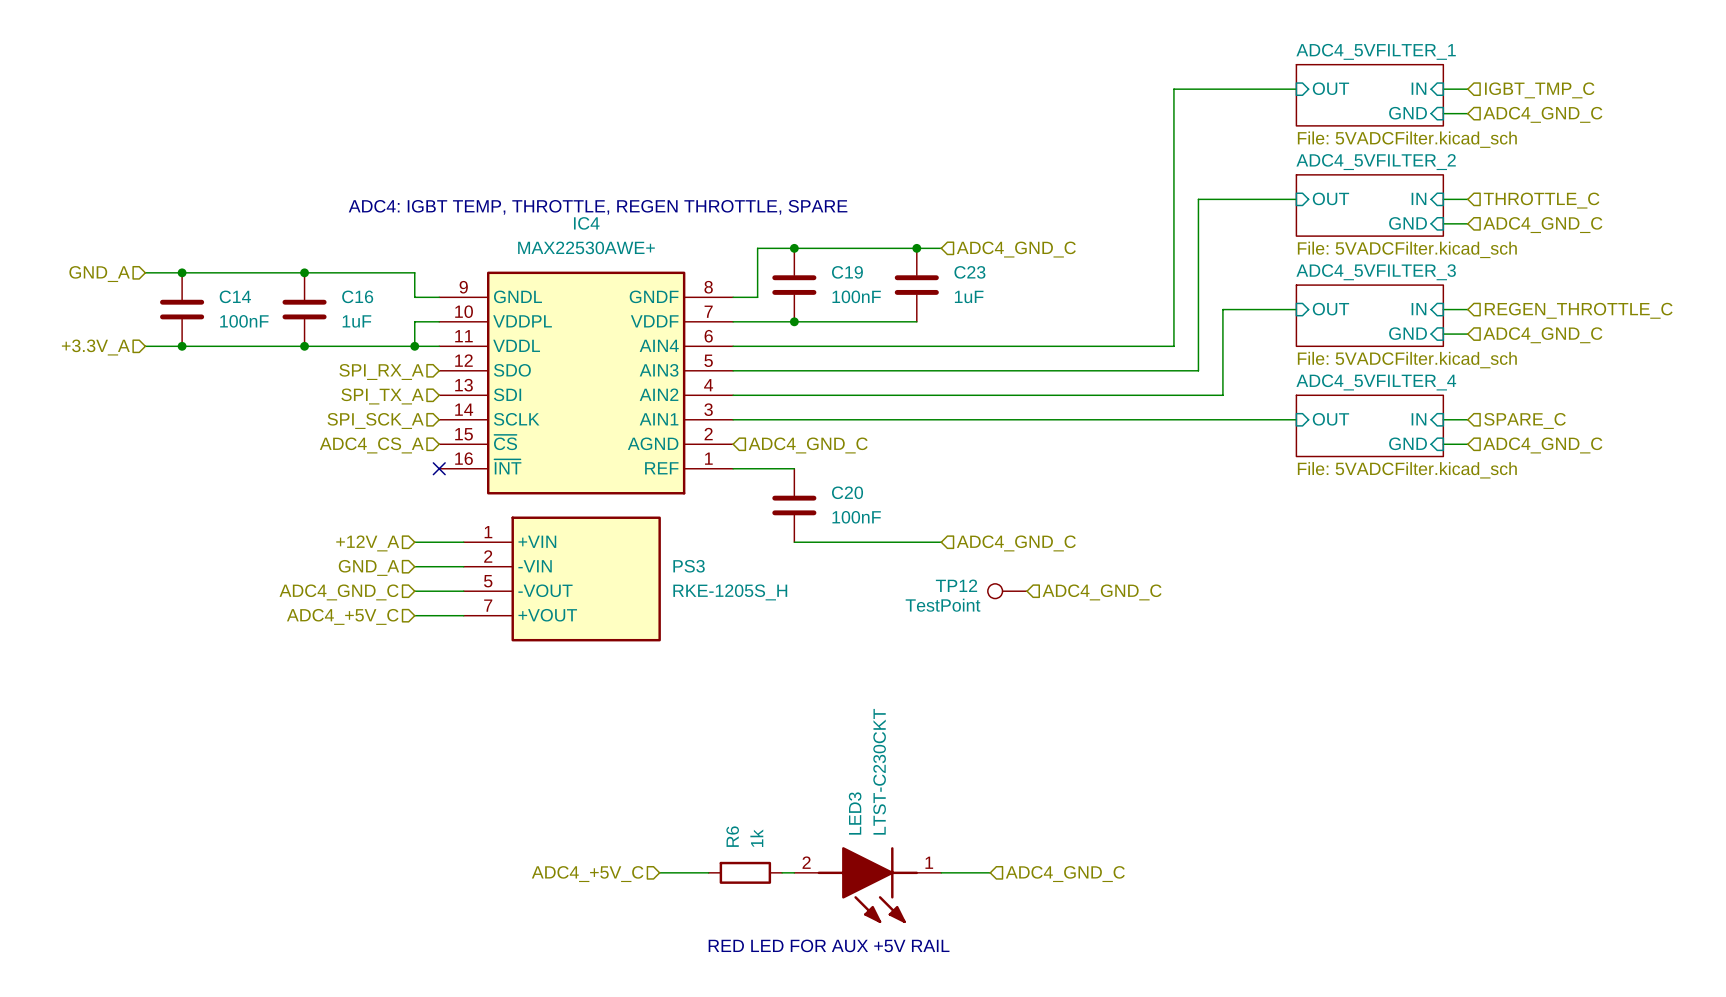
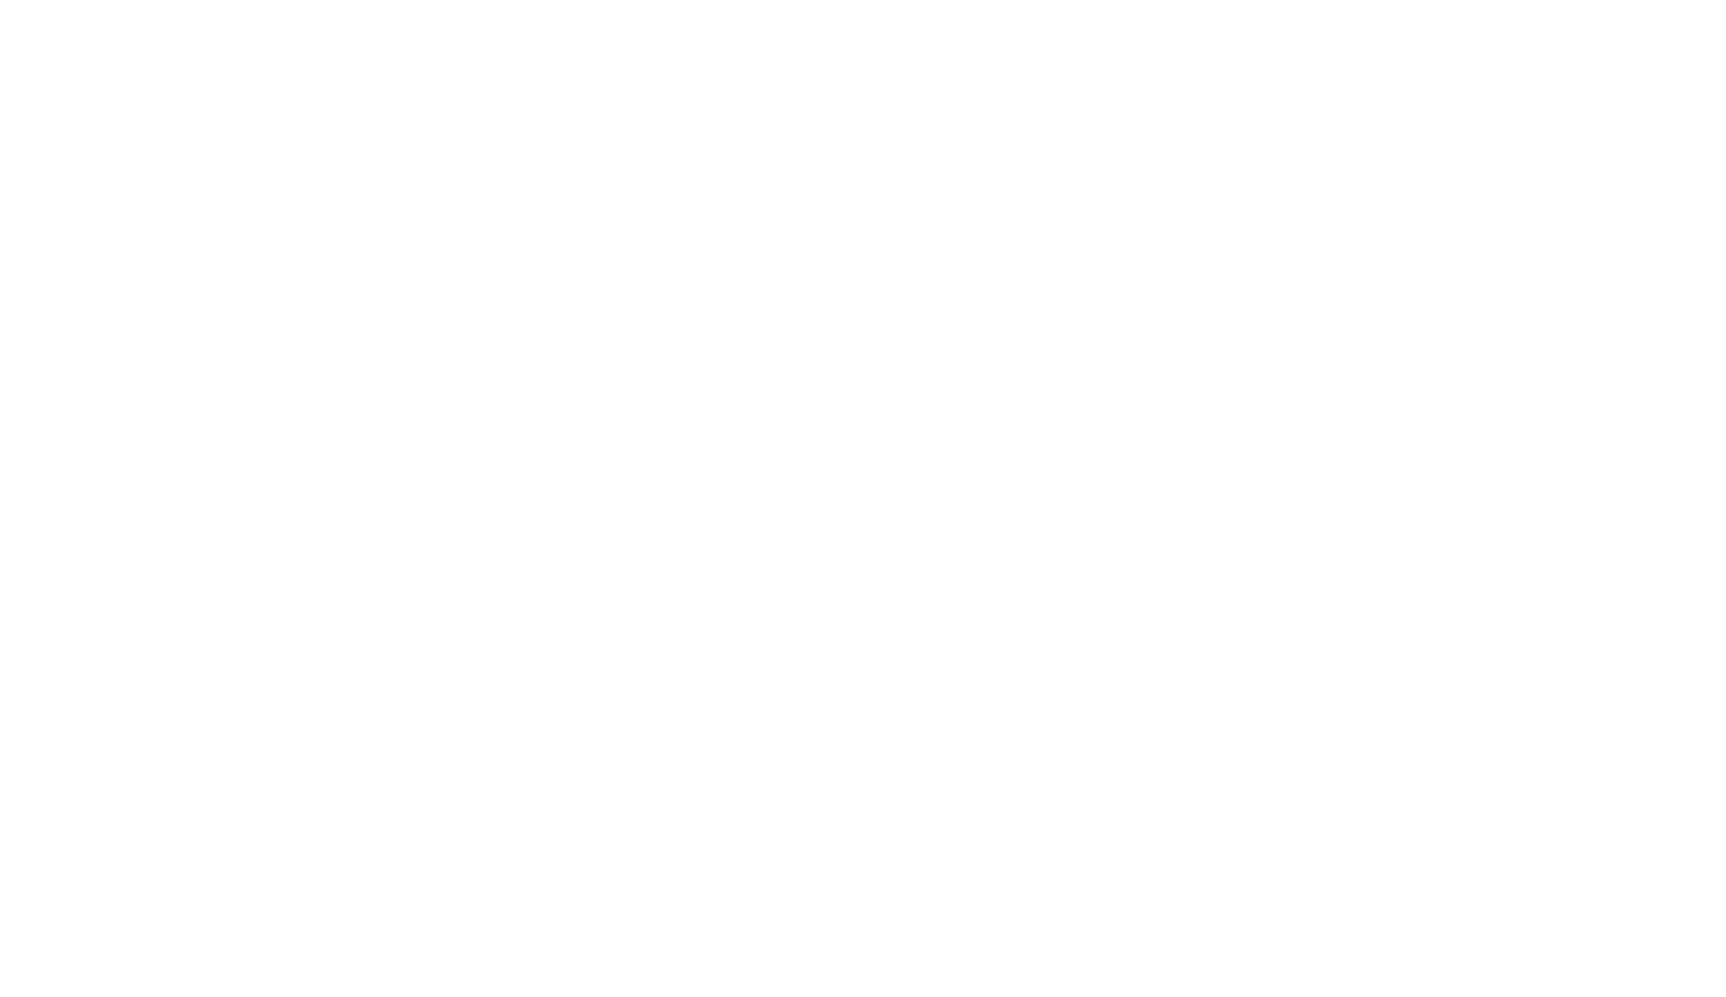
sheet pin: OUT (1330, 88) -> none
sheet pin: IN (1418, 88) -> none
wire: (1296, 89) (1173, 89) (1173, 346) (733, 346) -> none
wire: (1443, 89) (1467, 89) -> none
hierarchical label: IGBT_TMP_C (1539, 90) -> none
sheet ADC4_5VFILTER_1: File: 5VADCFilter.kicad_sch (1369, 95) -> none
sheet pin: GND (1408, 113) -> none
wire: (1443, 113) (1467, 113) -> none
hierarchical label: ADC4_GND_C (1542, 114) -> none
sheet pin: OUT (1330, 198) -> none
sheet pin: IN (1418, 198) -> none
wire: (1296, 199) (1198, 199) (1198, 370) (733, 370) -> none
wire: (1443, 199) (1467, 199) -> none
hierarchical label: THROTTLE_C (1541, 200) -> none
sheet ADC4_5VFILTER_2: File: 5VADCFilter.kicad_sch (1369, 205) -> none
text: ADC4: IGBT TEMP, THROTTLE, REGEN THROTTLE, SPARE (598, 207) -> none
sheet pin: GND (1408, 223) -> none
wire: (1443, 223) (1467, 223) -> none
hierarchical label: ADC4_GND_C (1542, 225) -> none
junction: (794, 248) -> none
junction: (916, 248) -> none
wire: (941, 248) (757, 248) (757, 297) (733, 297) -> none
hierarchical label: ADC4_GND_C (1016, 249) -> none
wire: (145, 272) (414, 272) (414, 297) (439, 297) -> none
junction: (182, 272) -> none
junction: (304, 272) -> none
hierarchical label: GND_A (99, 274) -> none
C19: 100nF (794, 285) -> none
C23: 1uF (916, 285) -> none
C14: 100nF (182, 309) -> none
C16: 1uF (304, 309) -> none
wire: (1296, 309) (1222, 309) (1222, 395) (733, 395) -> none
sheet pin: OUT (1330, 309) -> none
sheet pin: IN (1418, 309) -> none
wire: (1443, 309) (1467, 309) -> none
hierarchical label: REGEN_THROTTLE_C (1578, 310) -> none
sheet ADC4_5VFILTER_3: File: 5VADCFilter.kicad_sch (1369, 315) -> none
wire: (439, 321) (414, 321) (414, 346) -> none
wire: (733, 321) (916, 321) -> none
junction: (794, 321) -> none
sheet pin: GND (1408, 333) -> none
wire: (1443, 334) (1467, 334) -> none
hierarchical label: ADC4_GND_C (1542, 335) -> none
wire: (145, 346) (439, 346) -> none
junction: (182, 346) -> none
junction: (304, 346) -> none
junction: (414, 346) -> none
hierarchical label: +3.3V_A (95, 347) -> none
hierarchical label: SPI_RX_A (381, 372) -> none
IC4: MAX22530AWE+ (586, 383) -> none
hierarchical label: SPI_TX_A (382, 396) -> none
wire: (733, 419) (1296, 419) -> none
sheet pin: OUT (1330, 419) -> none
sheet pin: IN (1418, 419) -> none
wire: (1443, 419) (1467, 419) -> none
hierarchical label: SPI_SCK_A (375, 420) -> none
hierarchical label: SPARE_C (1525, 420) -> none
sheet ADC4_5VFILTER_4: File: 5VADCFilter.kicad_sch (1369, 425) -> none
sheet pin: GND (1408, 443) -> none
wire: (1443, 444) (1467, 444) -> none
hierarchical label: ADC4_CS_A (371, 445) -> none
hierarchical label: ADC4_GND_C (808, 445) -> none
hierarchical label: ADC4_GND_C (1542, 445) -> none
no-connect mark: (439, 468) -> none
wire: (733, 468) (794, 468) -> none
C20: 100nF (794, 505) -> none
wire: (414, 542) (463, 542) -> none
wire: (794, 542) (941, 542) -> none
hierarchical label: +12V_A (367, 543) -> none
hierarchical label: ADC4_GND_C (1016, 543) -> none
wire: (414, 566) (463, 566) -> none
hierarchical label: GND_A (368, 567) -> none
PS3: RKE-1205S_H (562, 578) -> none
wire: (414, 591) (463, 591) -> none
TP12: TestPoint (1007, 591) -> none
hierarchical label: ADC4_GND_C (339, 592) -> none
hierarchical label: ADC4_GND_C (1102, 592) -> none
wire: (414, 615) (463, 615) -> none
hierarchical label: ADC4_+5V_C (342, 616) -> none
wire: (659, 872) (708, 872) -> none
R6: 1k (745, 872) -> none
wire: (782, 872) (794, 872) -> none
wire: (941, 872) (990, 872) -> none
hierarchical label: ADC4_+5V_C (587, 874) -> none
hierarchical label: ADC4_GND_C (1065, 874) -> none
LED3: LTST-C230CKT (867, 885) -> none
text: RED LED FOR AUX +5V RAIL (829, 945) -> none

